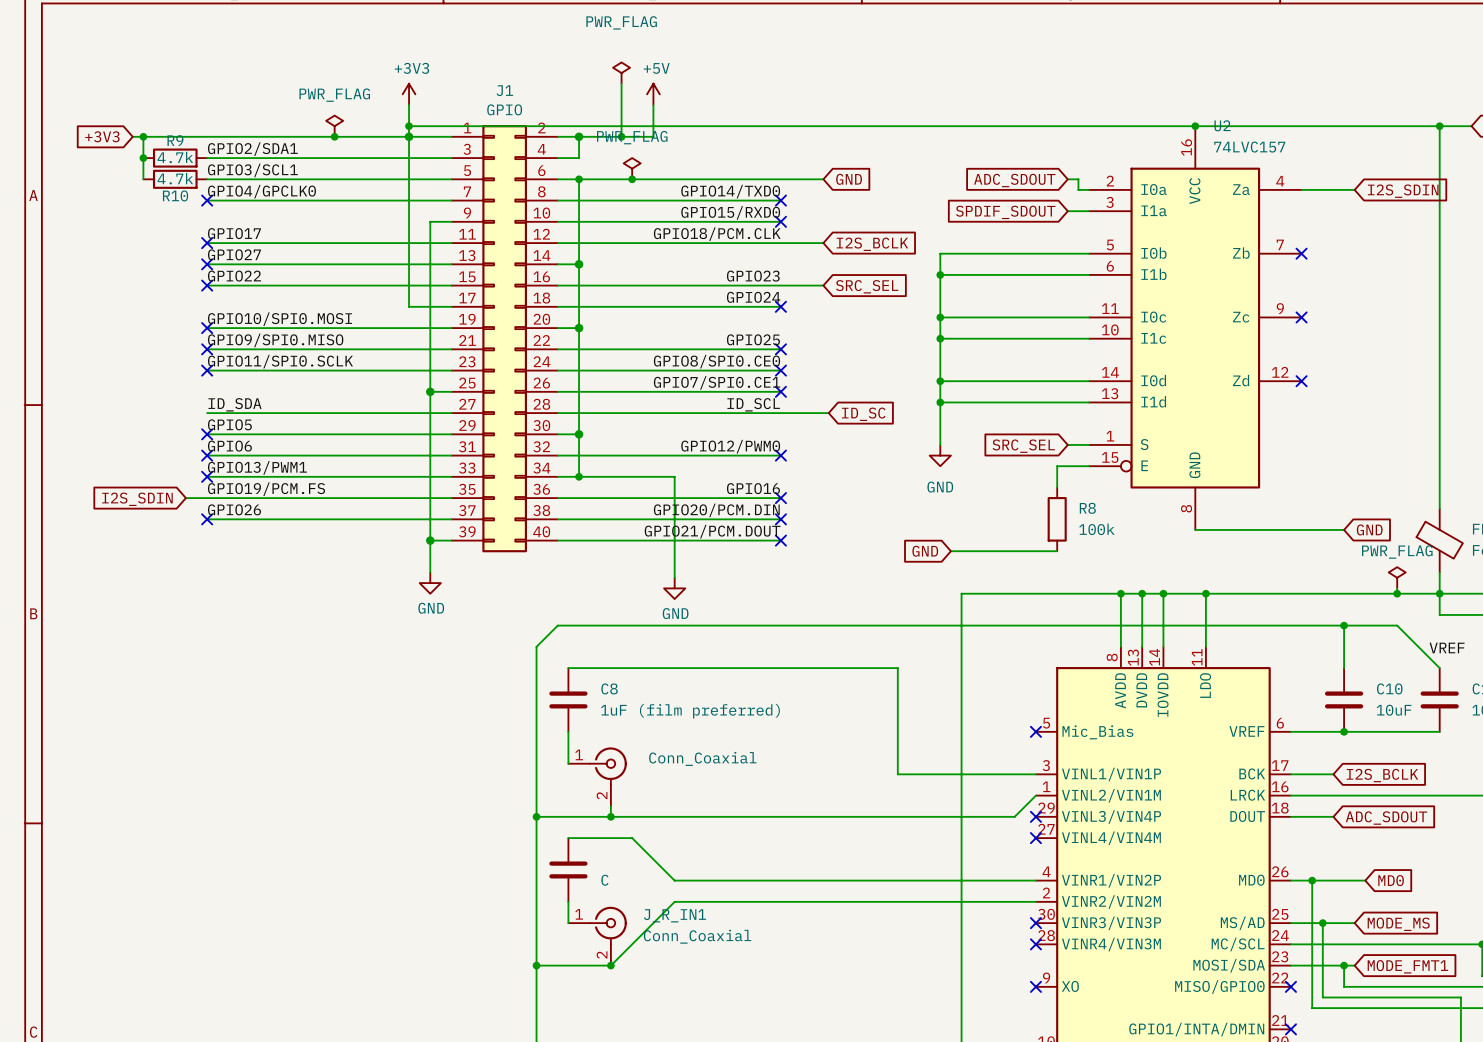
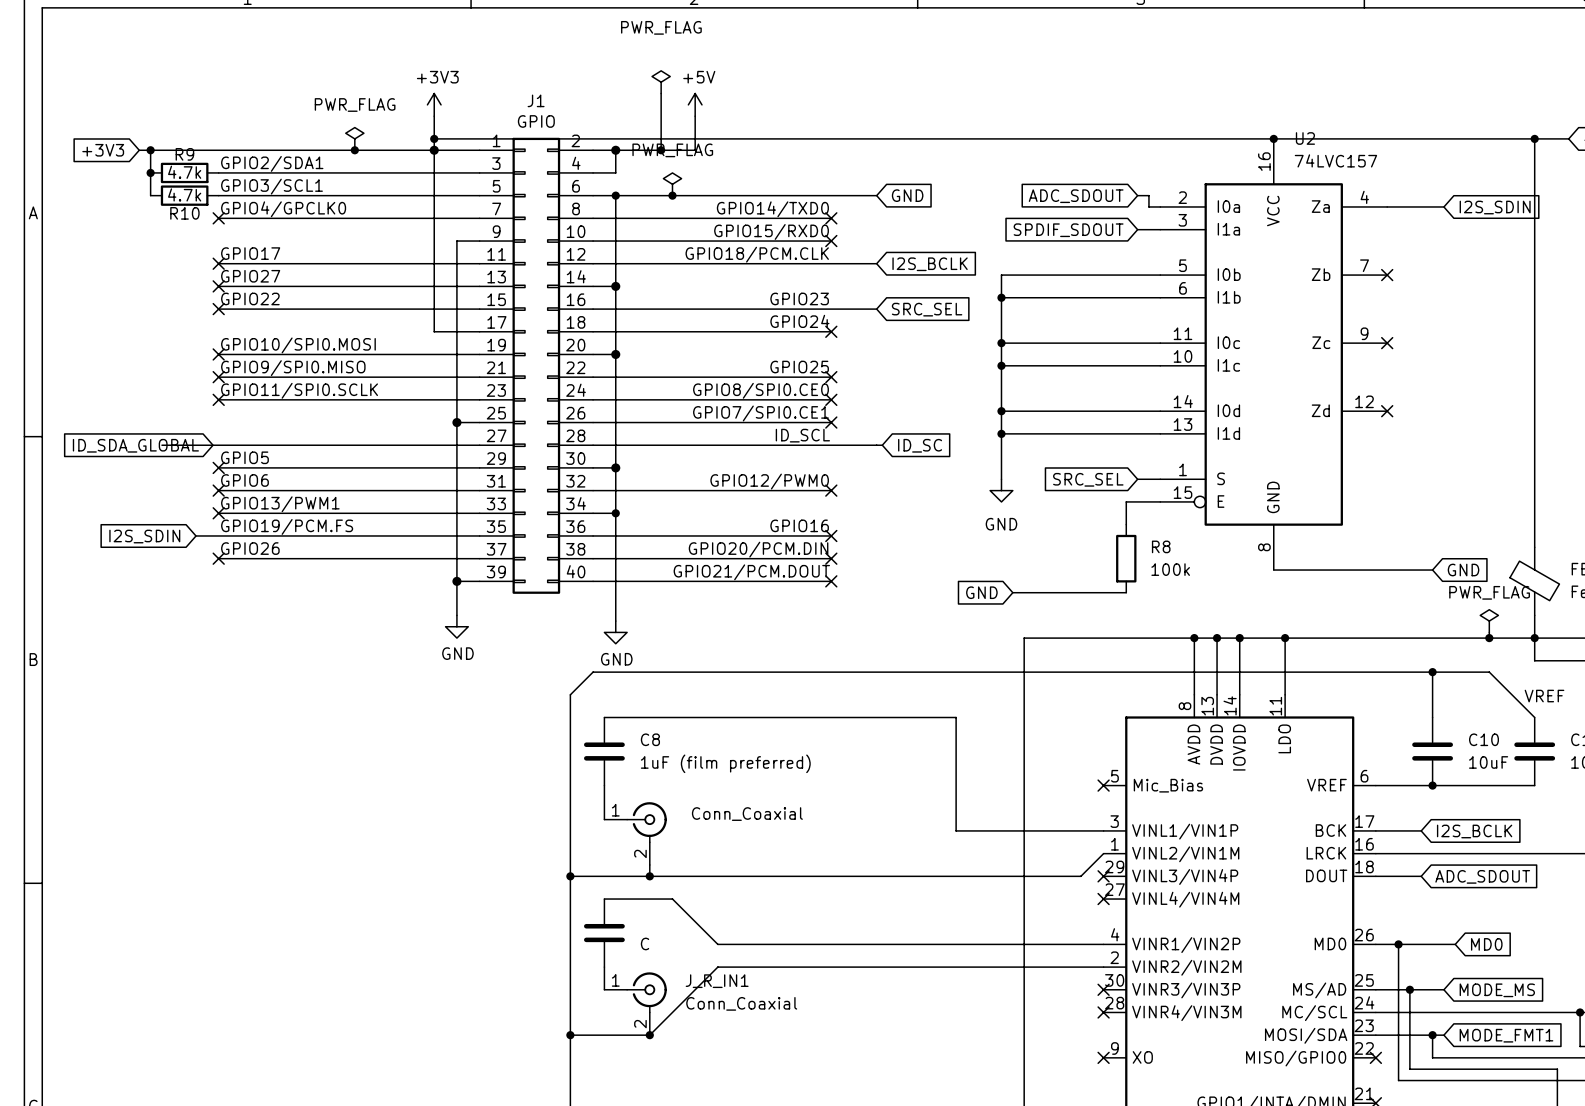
label: ID_SDA (234, 404) -> none
wire: none -> (161, 445) (218, 445)
global label: none -> ID_SDA_GLOBAL (135, 445)
wire: (579, 476) (674, 476) (674, 577) -> (615, 513) (615, 621)
power symbol position: GND (674, 588) -> GND (615, 632)

